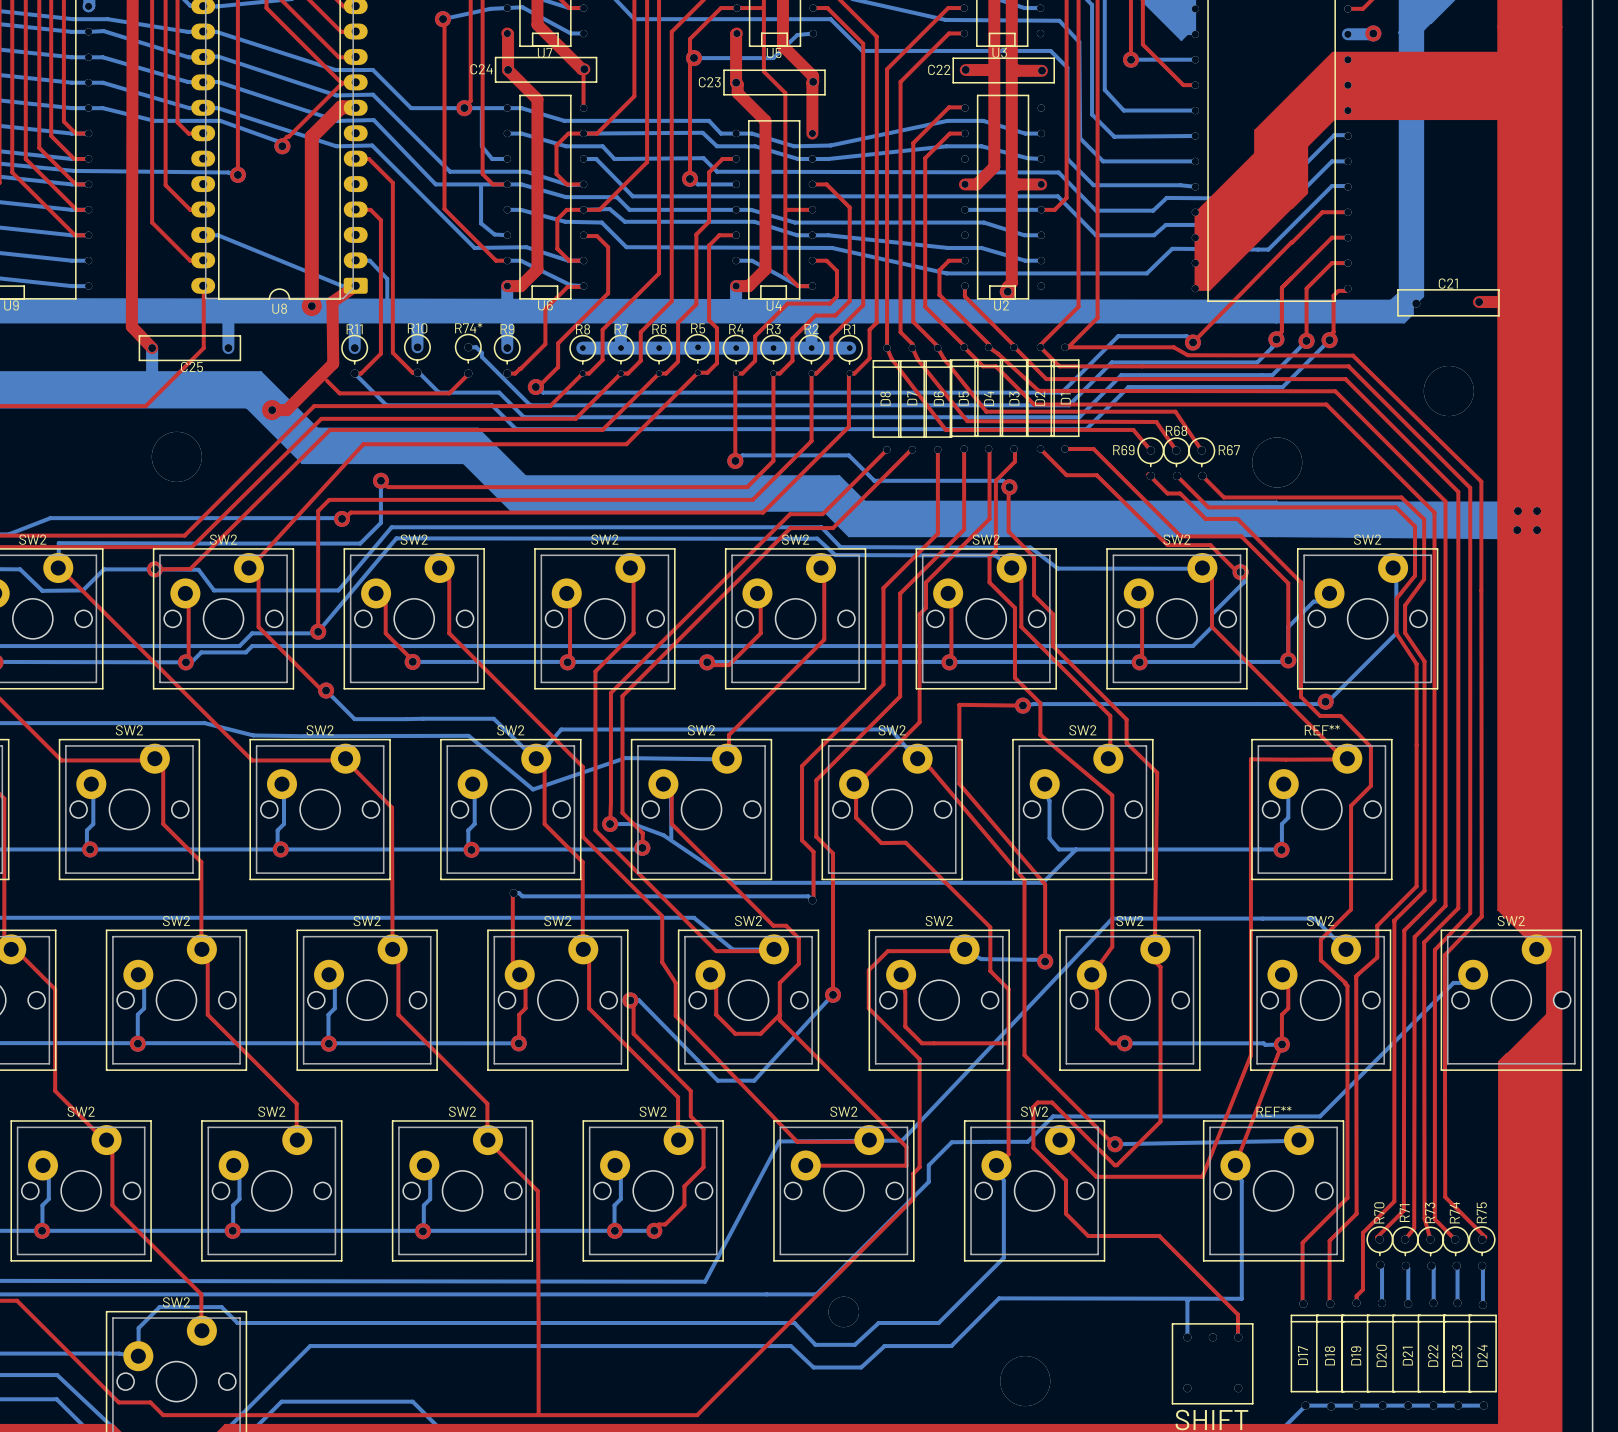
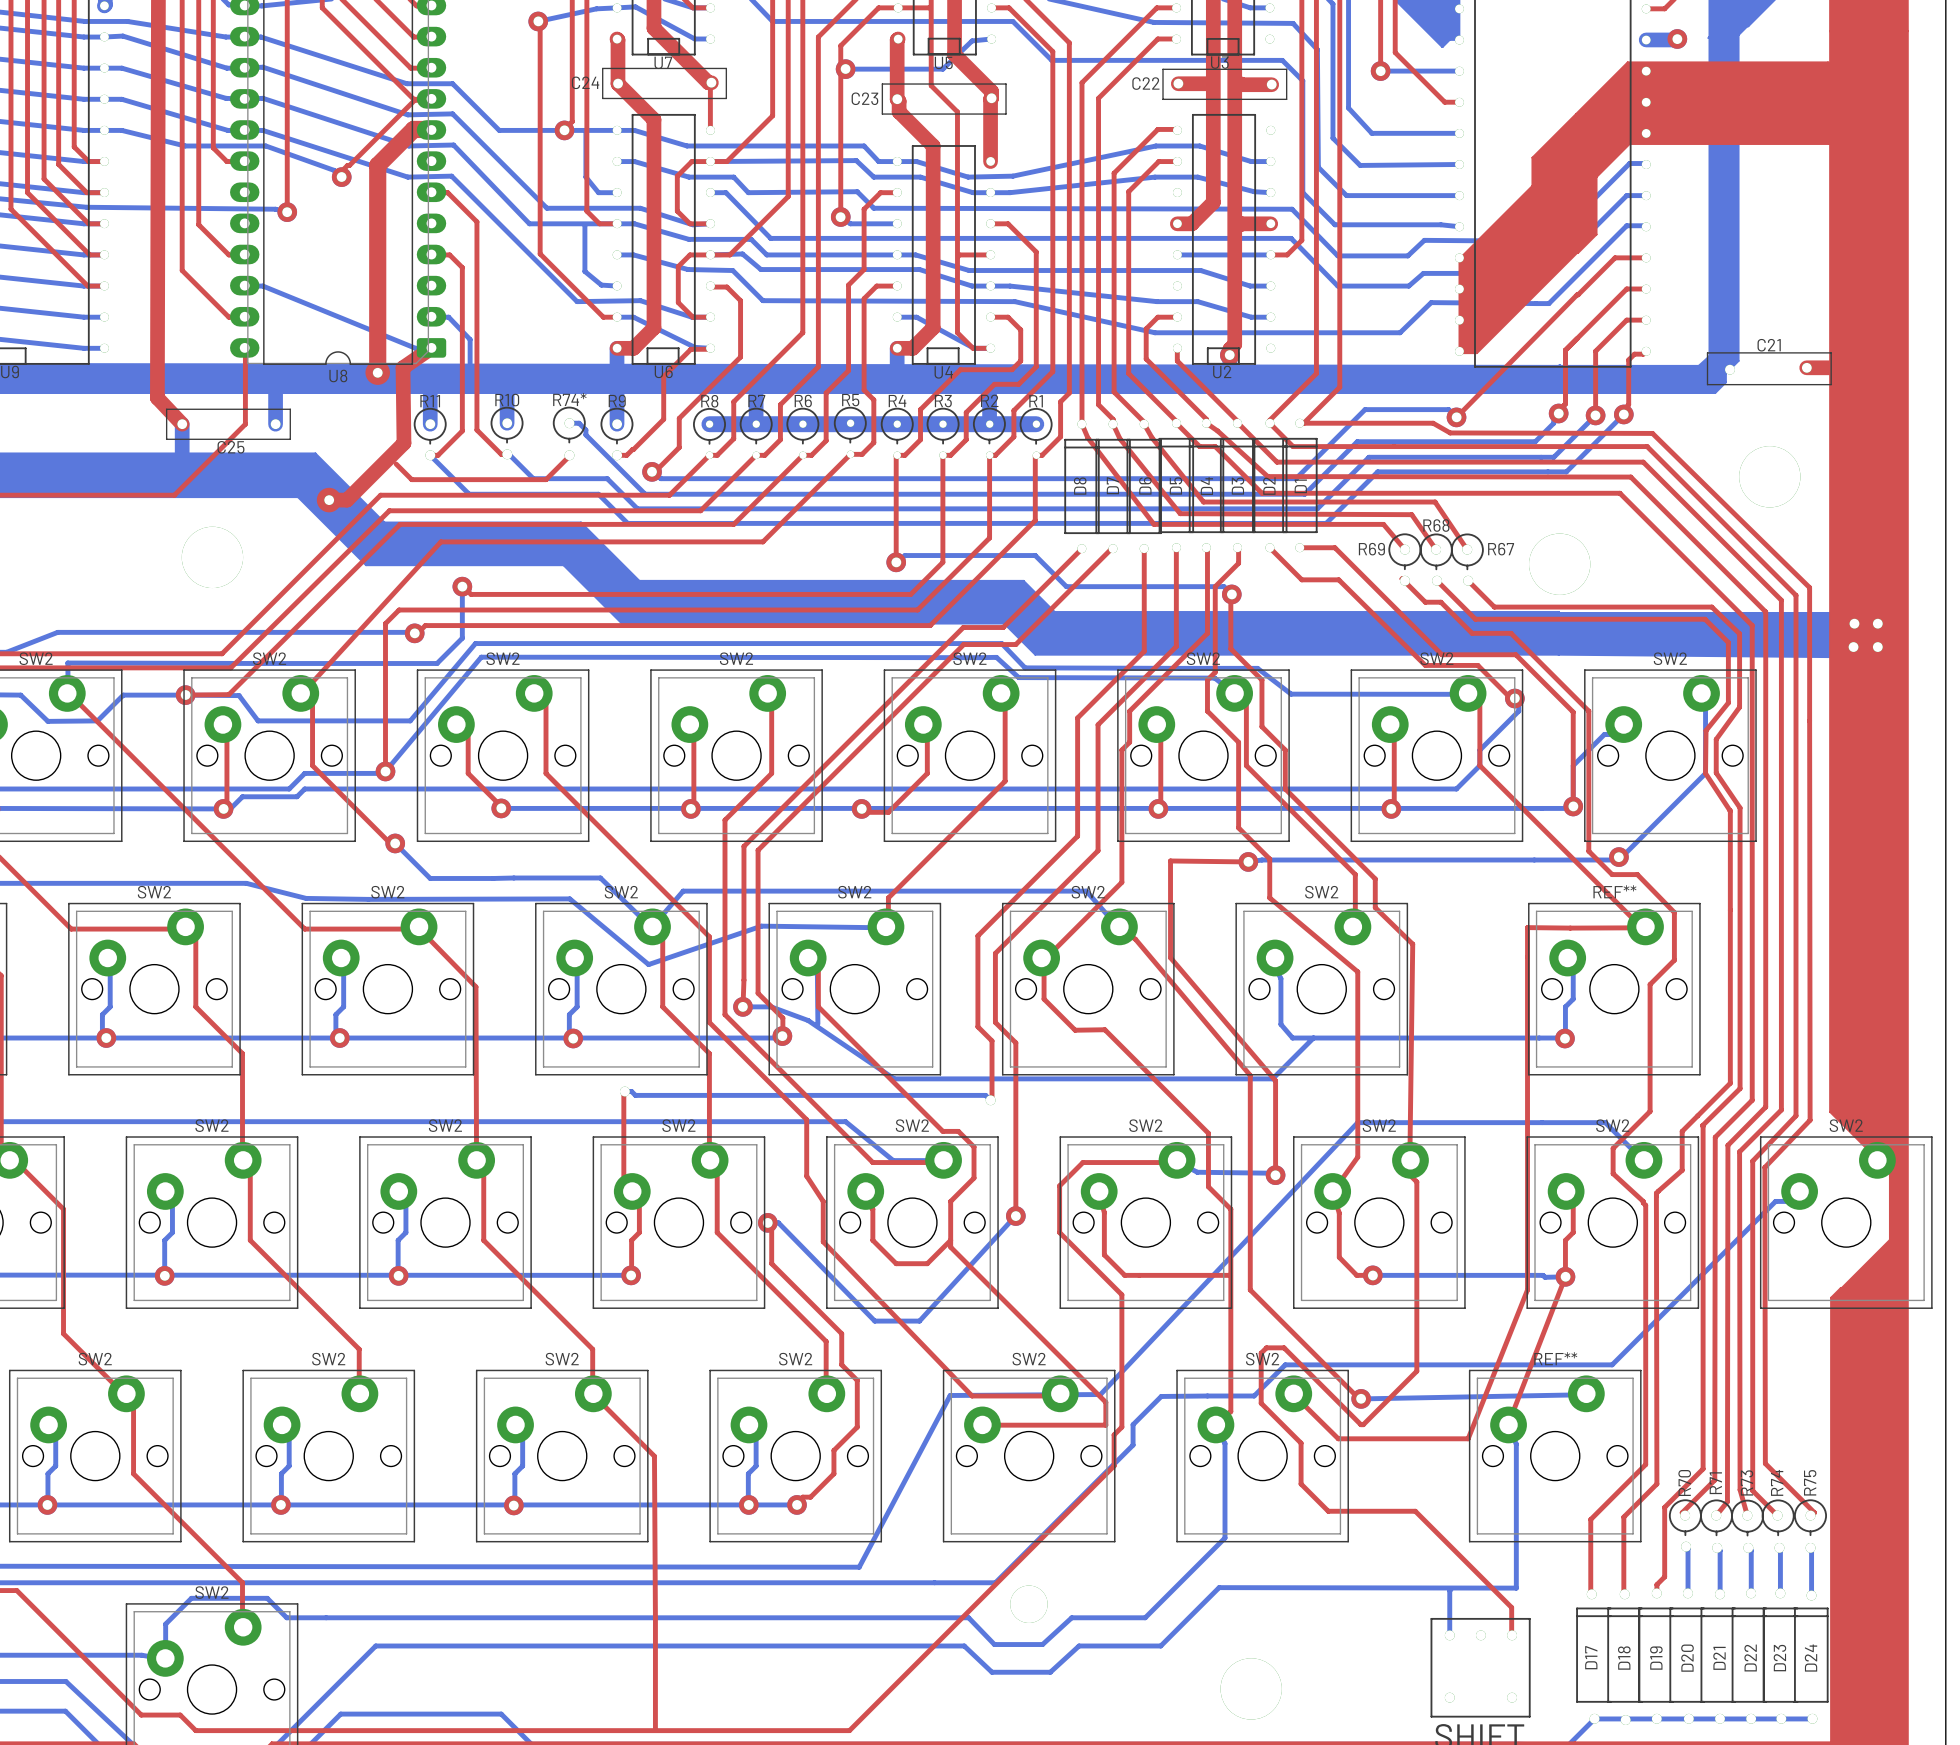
SW2 footprint: [1440, 929, 1582, 1071] -> [1759, 1136, 1933, 1309]

